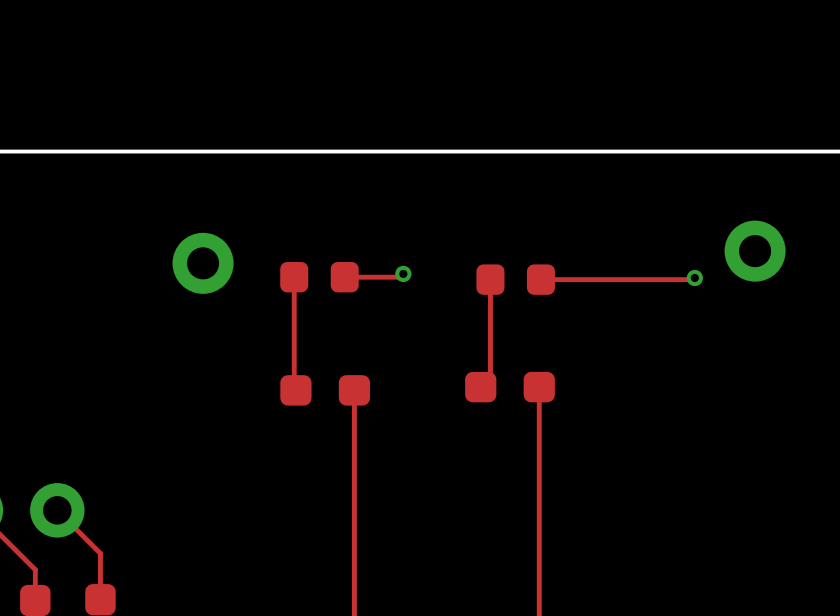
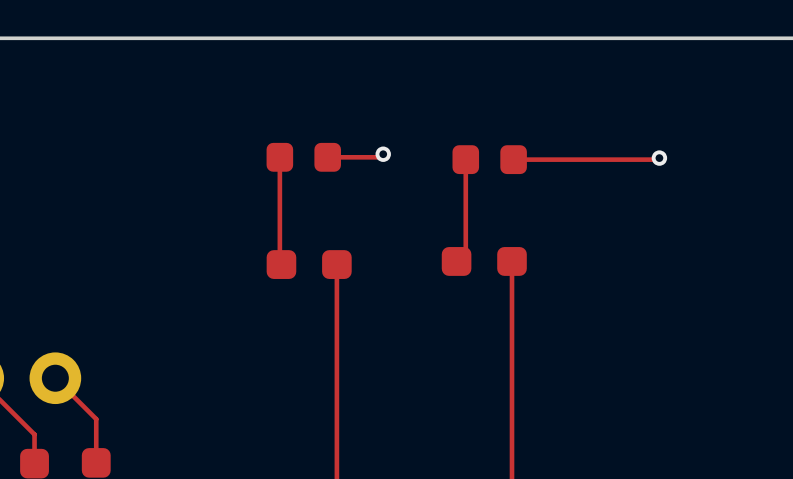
part: (755, 251) -> none
part: (203, 263) -> none

